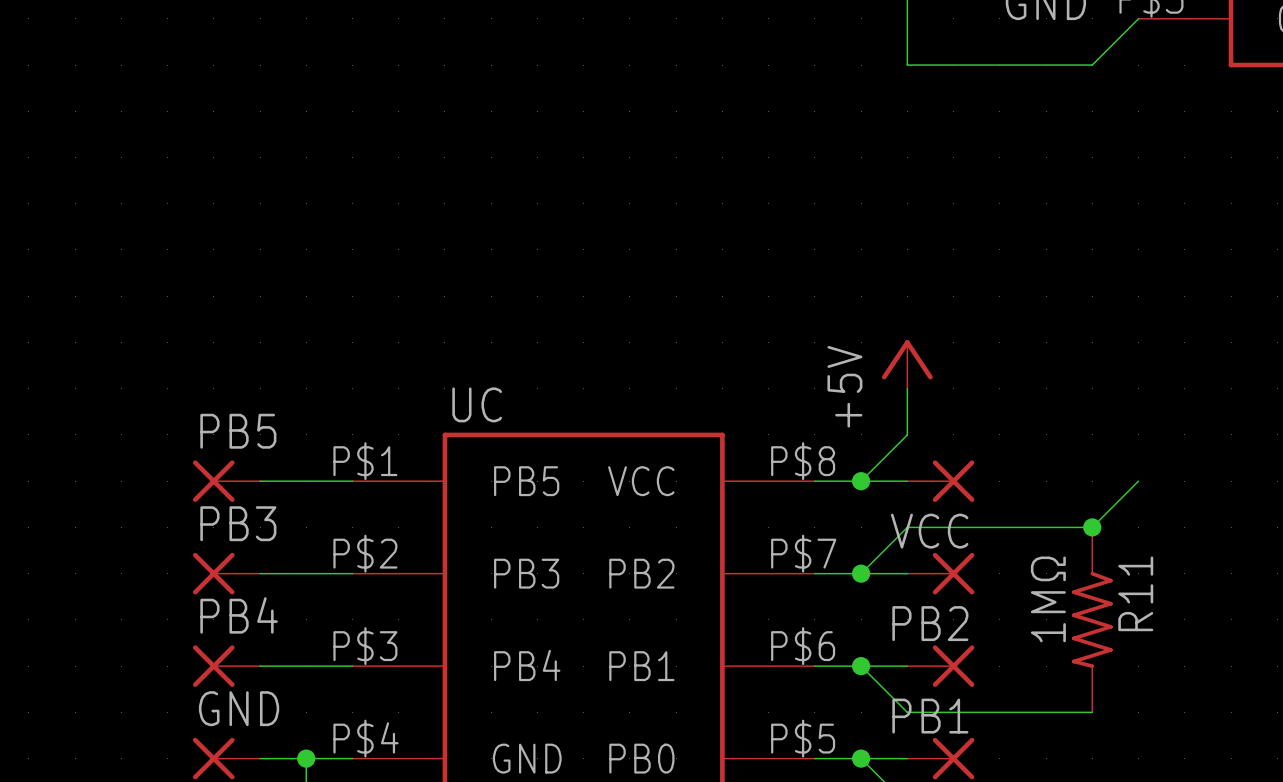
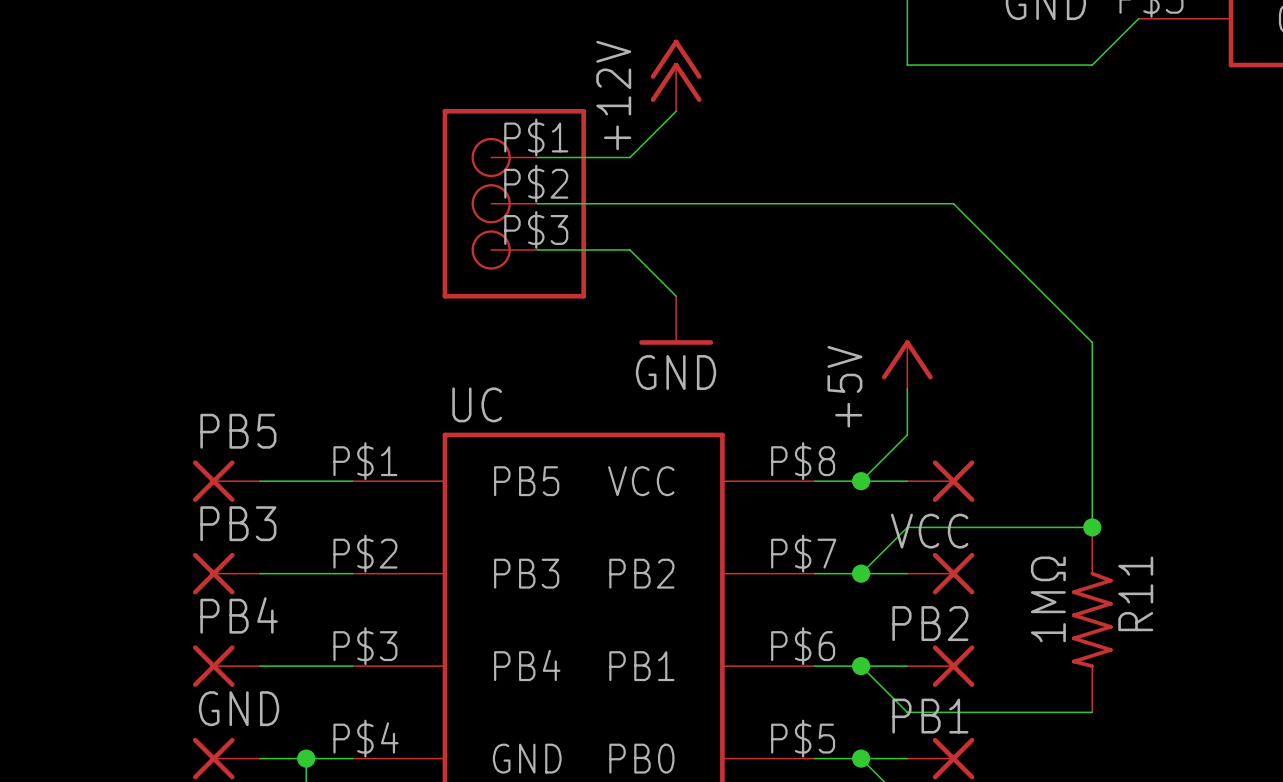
power symbol: none -> +12V (676, 75)
wire: none -> (676, 111) (629, 157) (537, 157)
part: none -> (514, 203)
wire: none -> (537, 249) (629, 249) (676, 296)
power symbol: none -> GND (676, 320)
wire: (1138, 481) (1092, 527) -> (537, 203) (953, 203) (1092, 342) (1092, 527)

